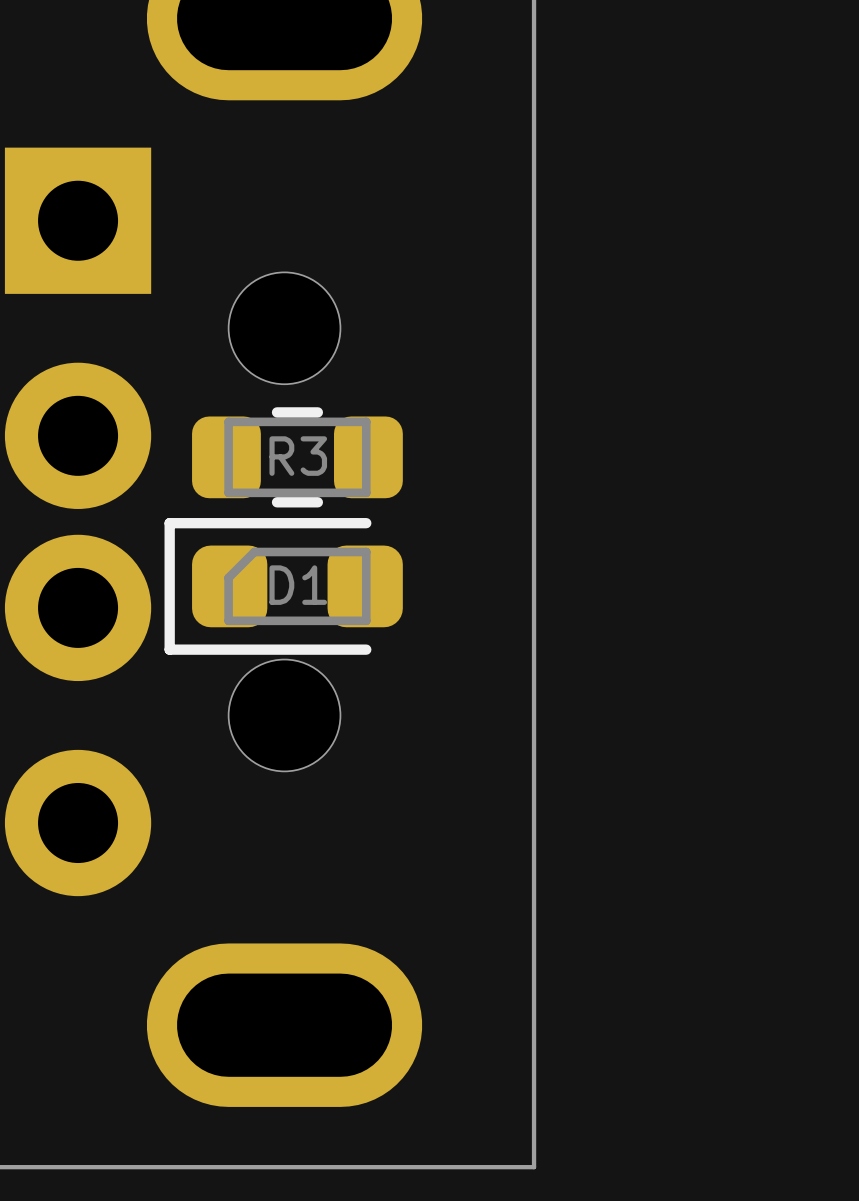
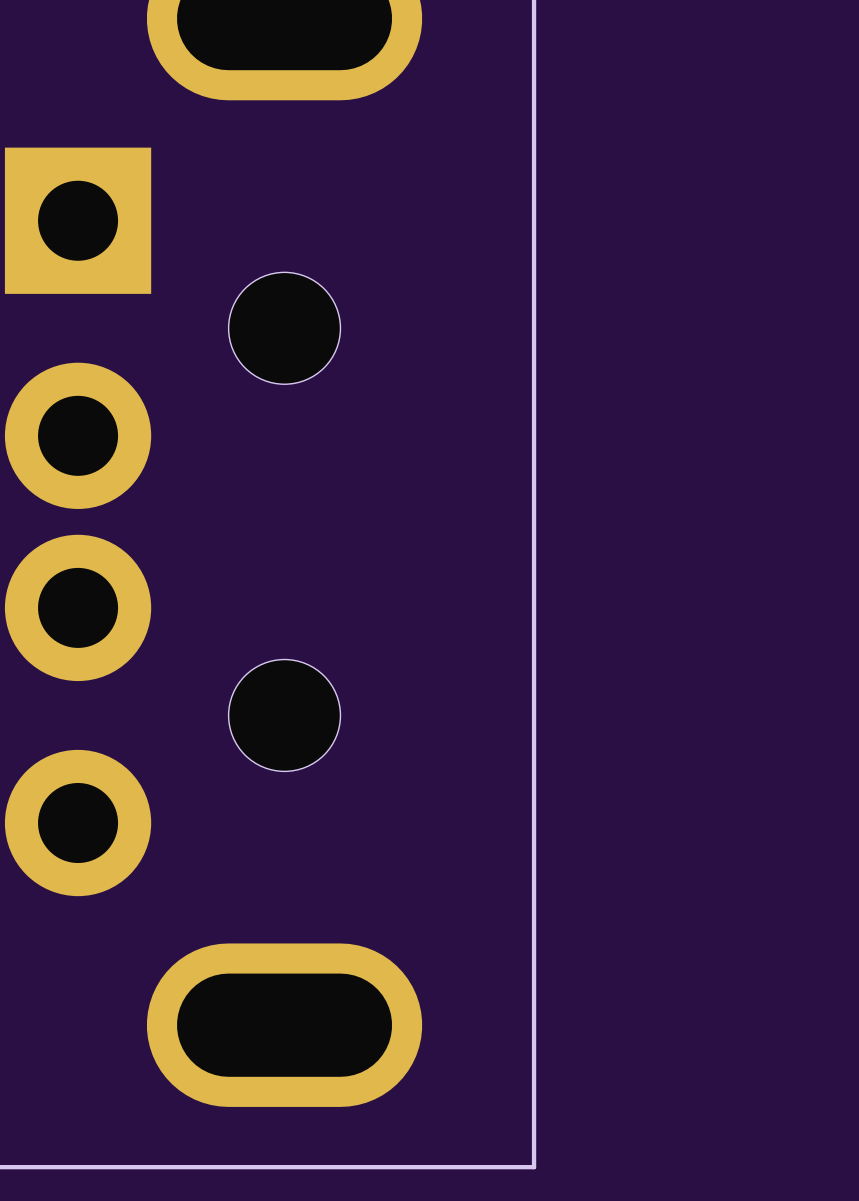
R3: (297, 457) -> none
D1: (283, 586) -> none

